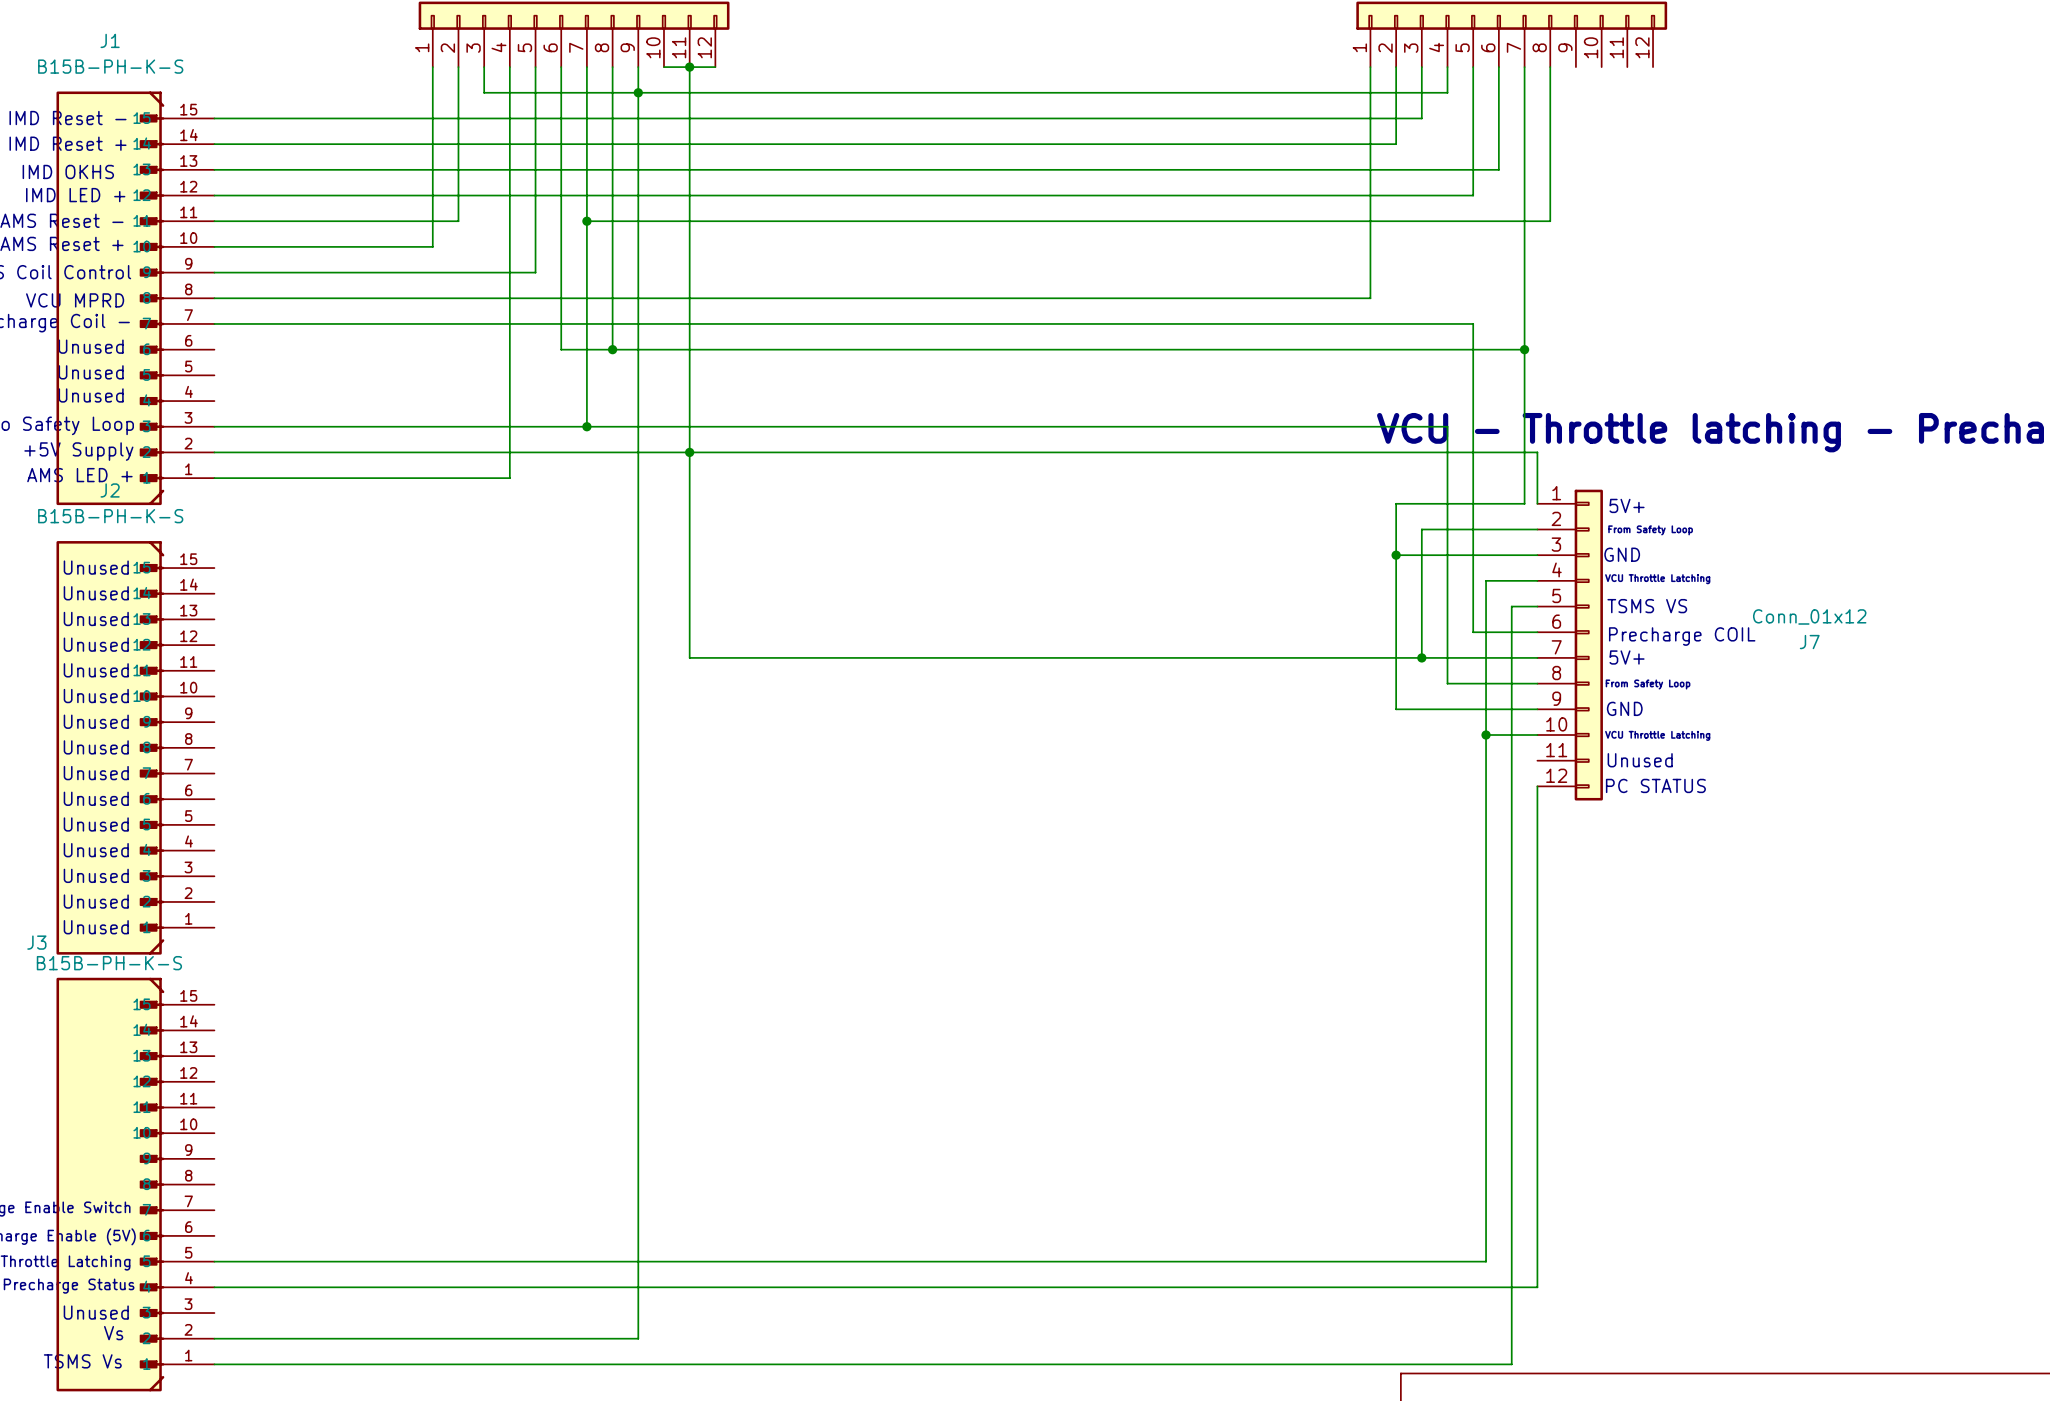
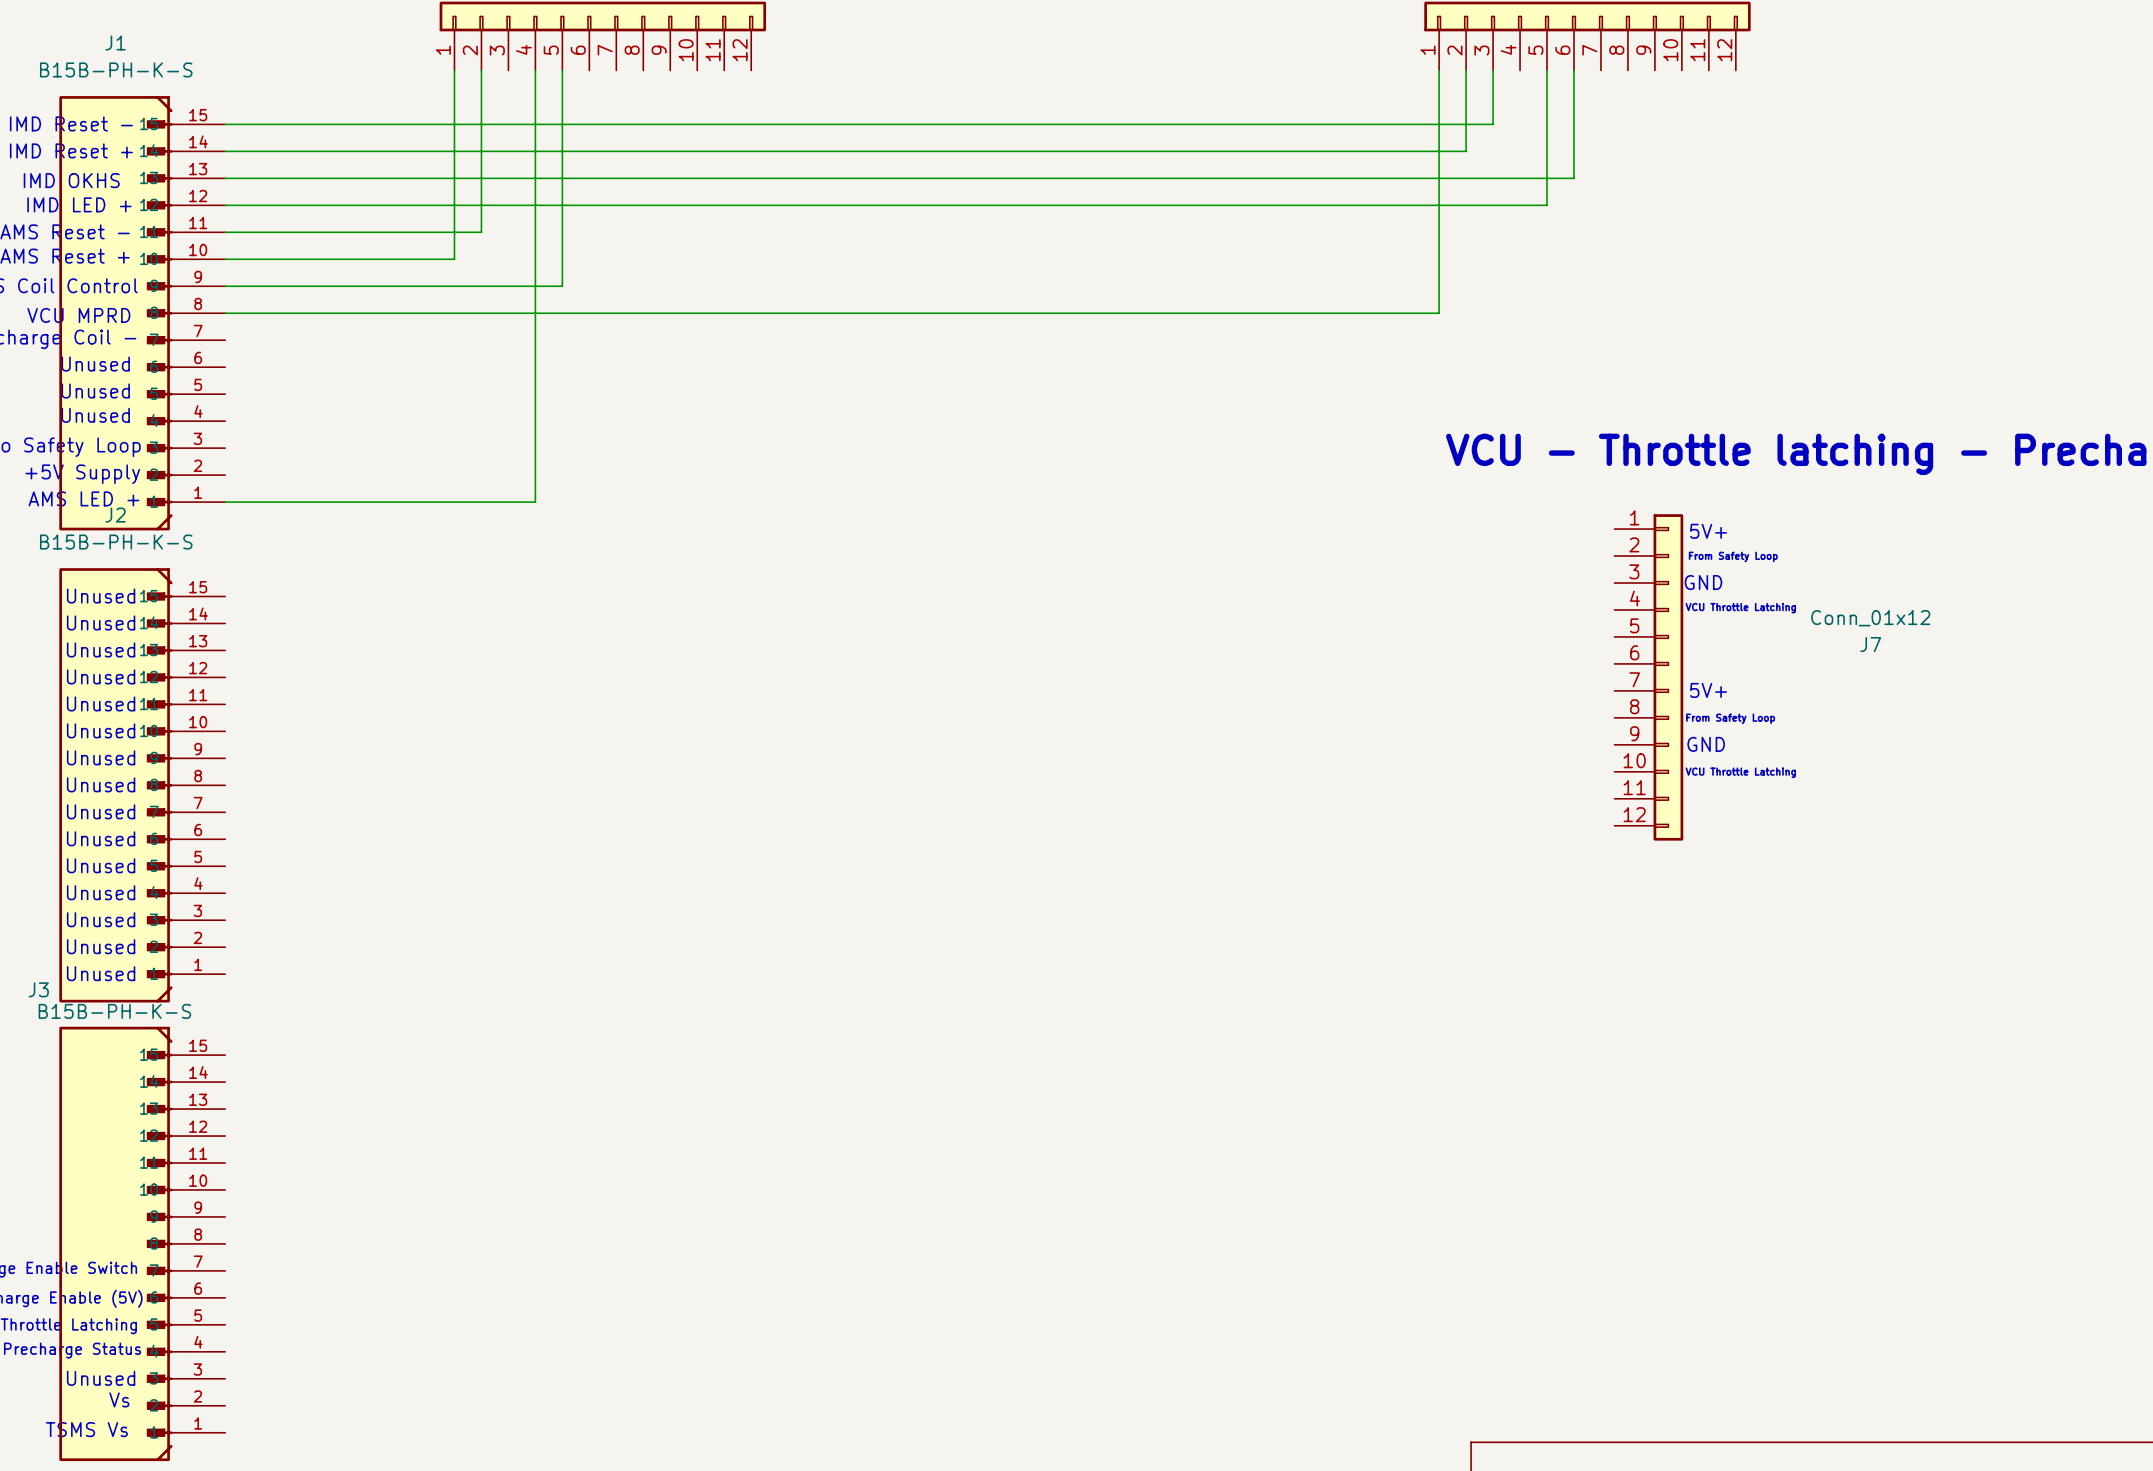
wire: (484, 67) (484, 92) (1447, 92) (1447, 67) -> none
wire: (561, 67) (561, 349) (1524, 349) -> none
wire: (586, 67) (586, 426) -> none
wire: (612, 67) (612, 349) -> none
wire: (638, 67) (638, 1338) (214, 1338) -> none
wire: (663, 67) (715, 67) -> none
wire: (689, 67) (689, 657) (1537, 657) -> none
junction: (689, 67) -> none
wire: (1524, 67) (1524, 503) (1396, 503) (1396, 709) (1537, 709) -> none
wire: (1550, 67) (1550, 221) (586, 221) -> none
junction: (638, 92) -> none
junction: (586, 221) -> none
wire: (214, 323) (1473, 323) (1473, 632) (1537, 632) -> none
junction: (612, 349) -> none
junction: (1524, 349) -> none
wire: (214, 426) (1447, 426) (1447, 683) (1537, 683) -> none
junction: (586, 426) -> none
wire: (214, 452) (1537, 452) (1537, 503) -> none
junction: (689, 452) -> none
wire: (1537, 529) (1421, 529) (1421, 657) -> none
wire: (1396, 555) (1537, 555) -> none
junction: (1396, 555) -> none
wire: (1537, 580) (1486, 580) (1486, 1261) (214, 1261) -> none
wire: (1537, 606) (1511, 606) (1511, 1364) (214, 1364) -> none
text: TSMS VS (1647, 606) -> none
J7 value position: Conn_01x12 (1809, 616) -> Conn_01x12 (1870, 618)
text: Precharge COIL (1682, 636) -> none
J7 name position: J7 (1809, 642) -> J7 (1870, 644)
junction: (1421, 657) -> none
wire: (1486, 735) (1537, 735) -> none
junction: (1486, 735) -> none
text: Unused (1640, 760) -> none
text: PC STATUS (1655, 785) -> none
wire: (1537, 786) (1537, 1287) (214, 1287) -> none

